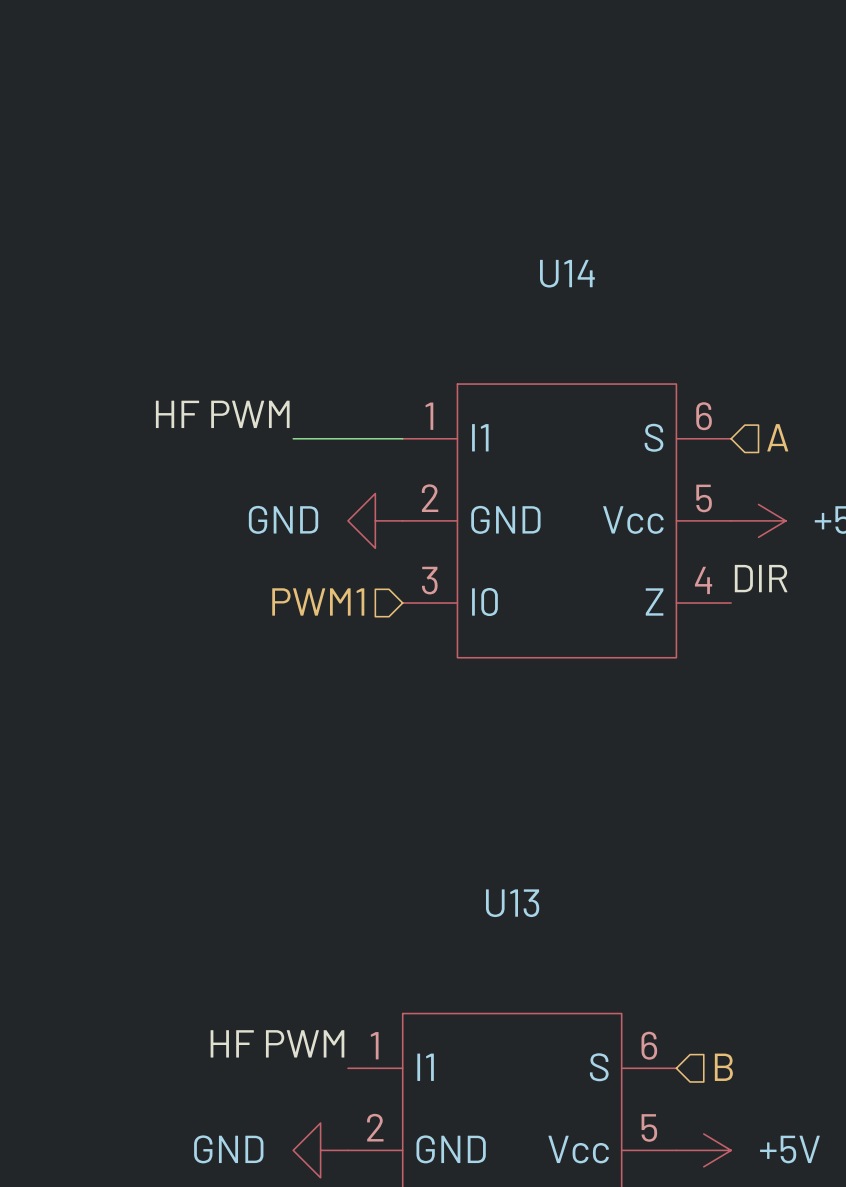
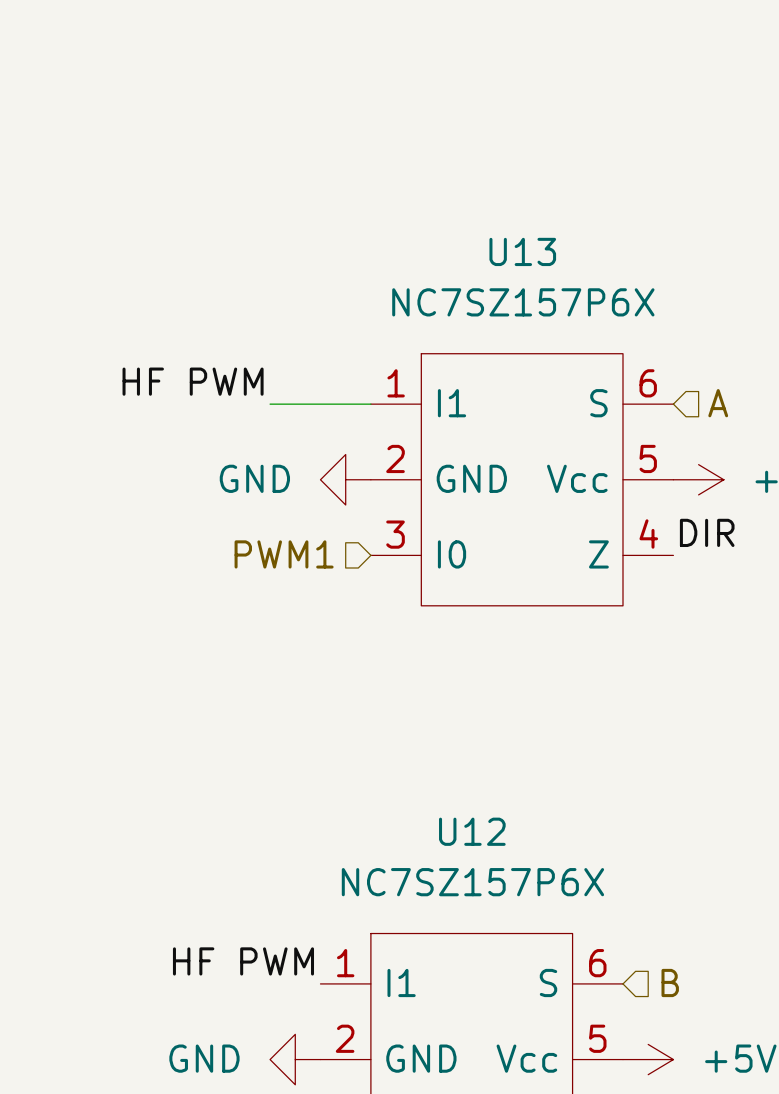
U14 name: U14 (567, 273) -> U13 (522, 251)
U14 value: none -> NC7SZ157P6X (523, 302)
U13 name: U13 (512, 903) -> U12 (472, 831)
U13 value: none -> NC7SZ157P6X (472, 882)

